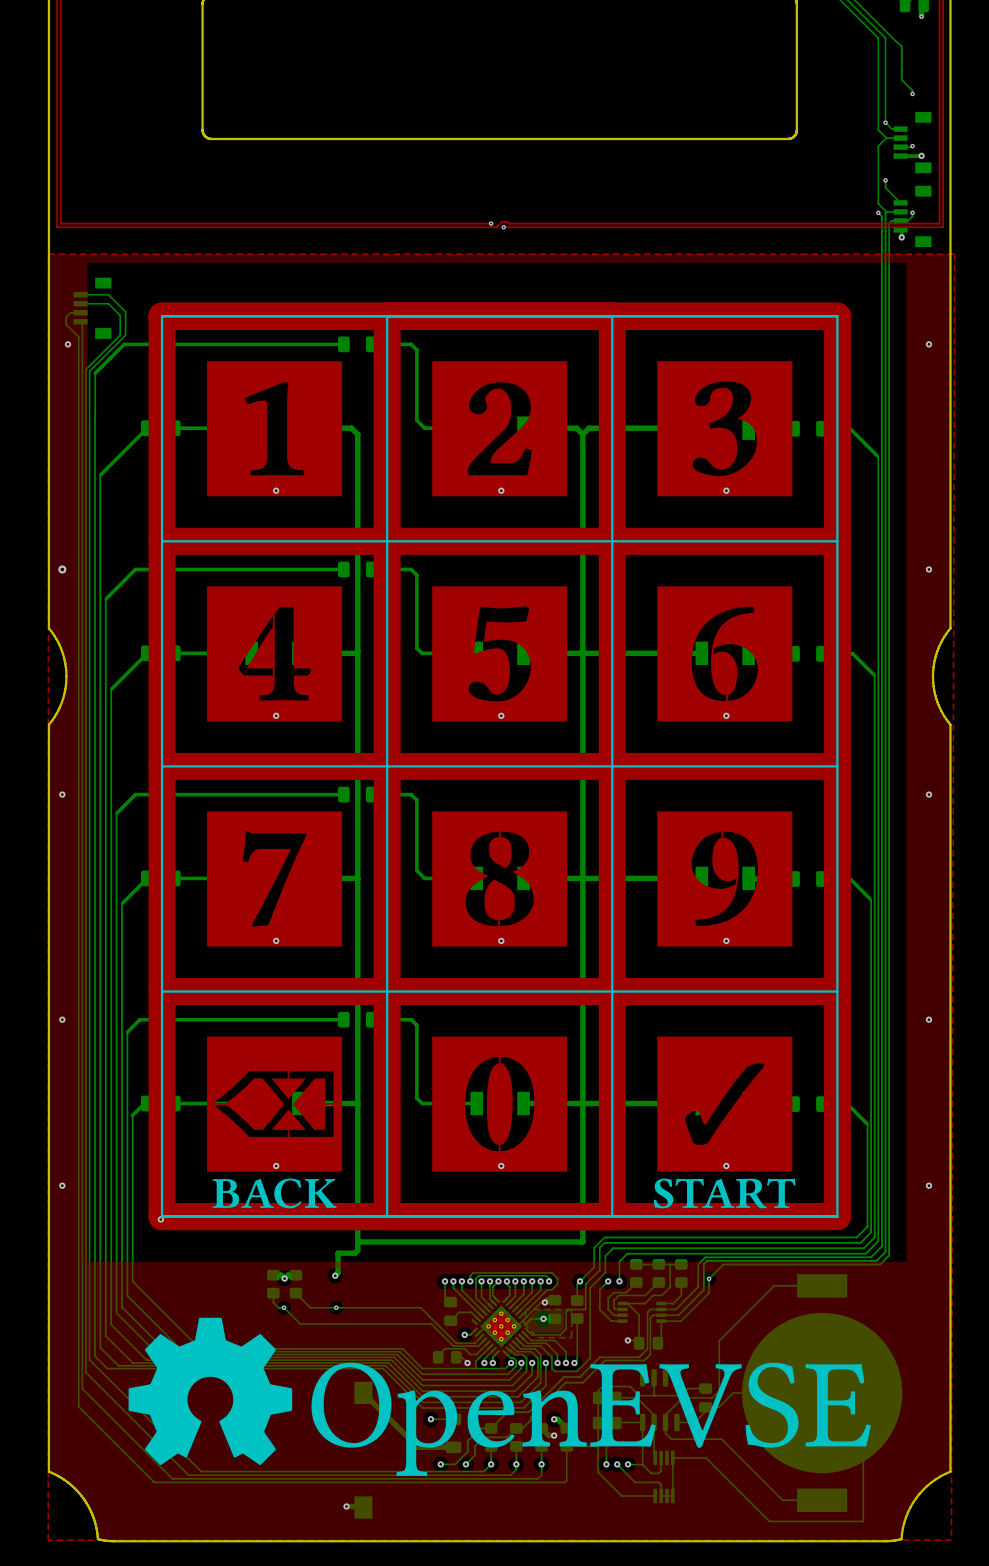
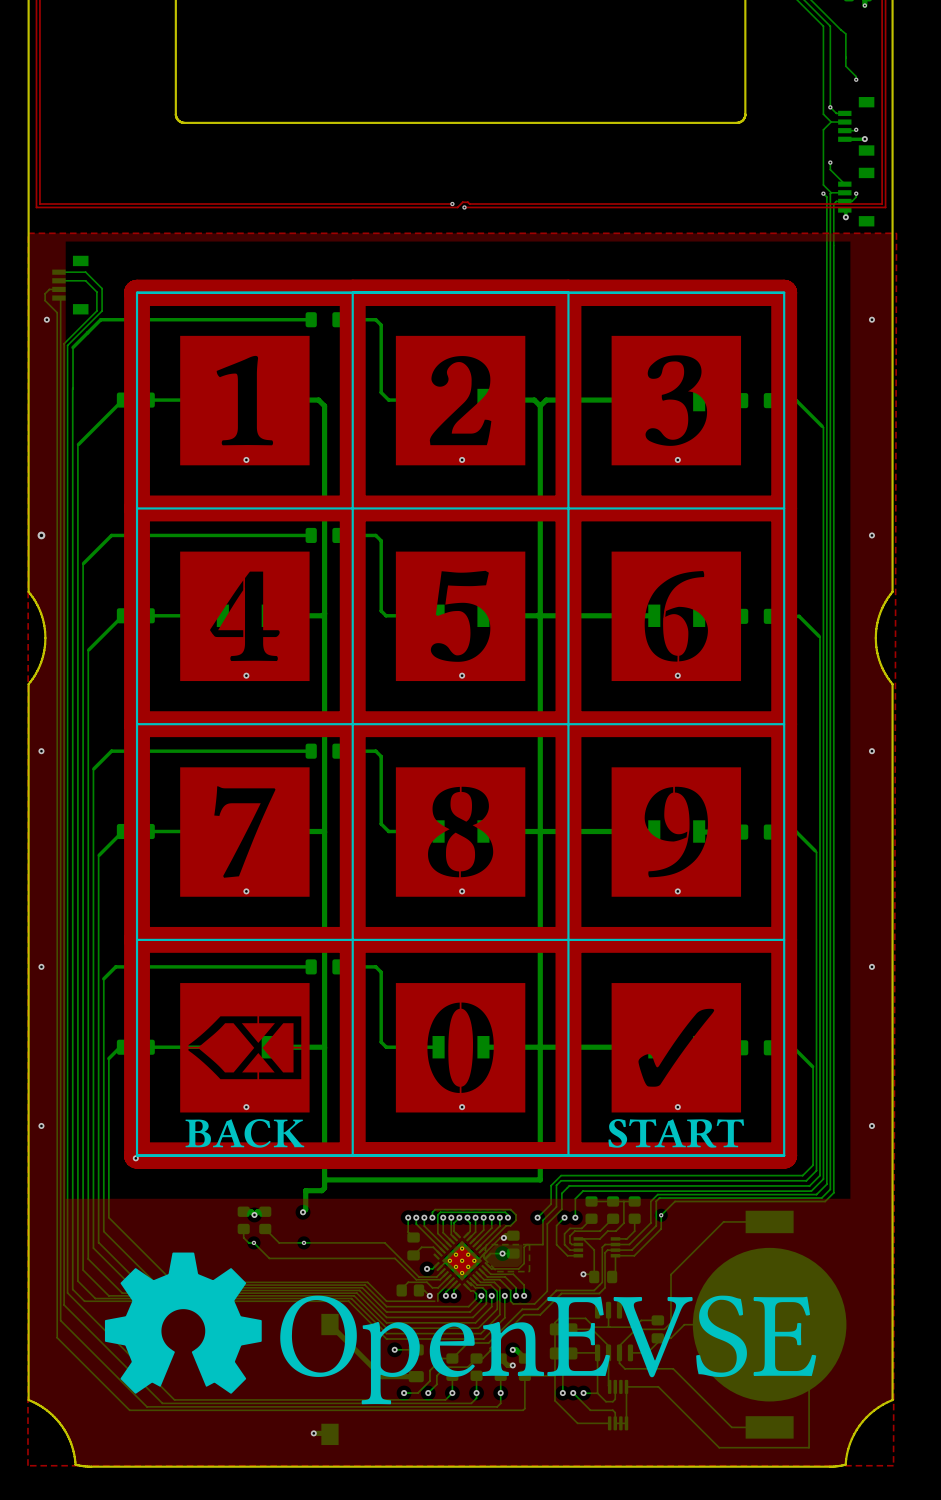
bottom track: (580, 1281) (577, 1284) (577, 1300) -> none
part: (577, 1309) -> none
bottom track: (577, 1318) (577, 1360) (574, 1362) -> none
via: (574, 1362) -> none
bottom track: (511, 1363) (505, 1368) (472, 1368) -> none
via: (511, 1363) -> none

